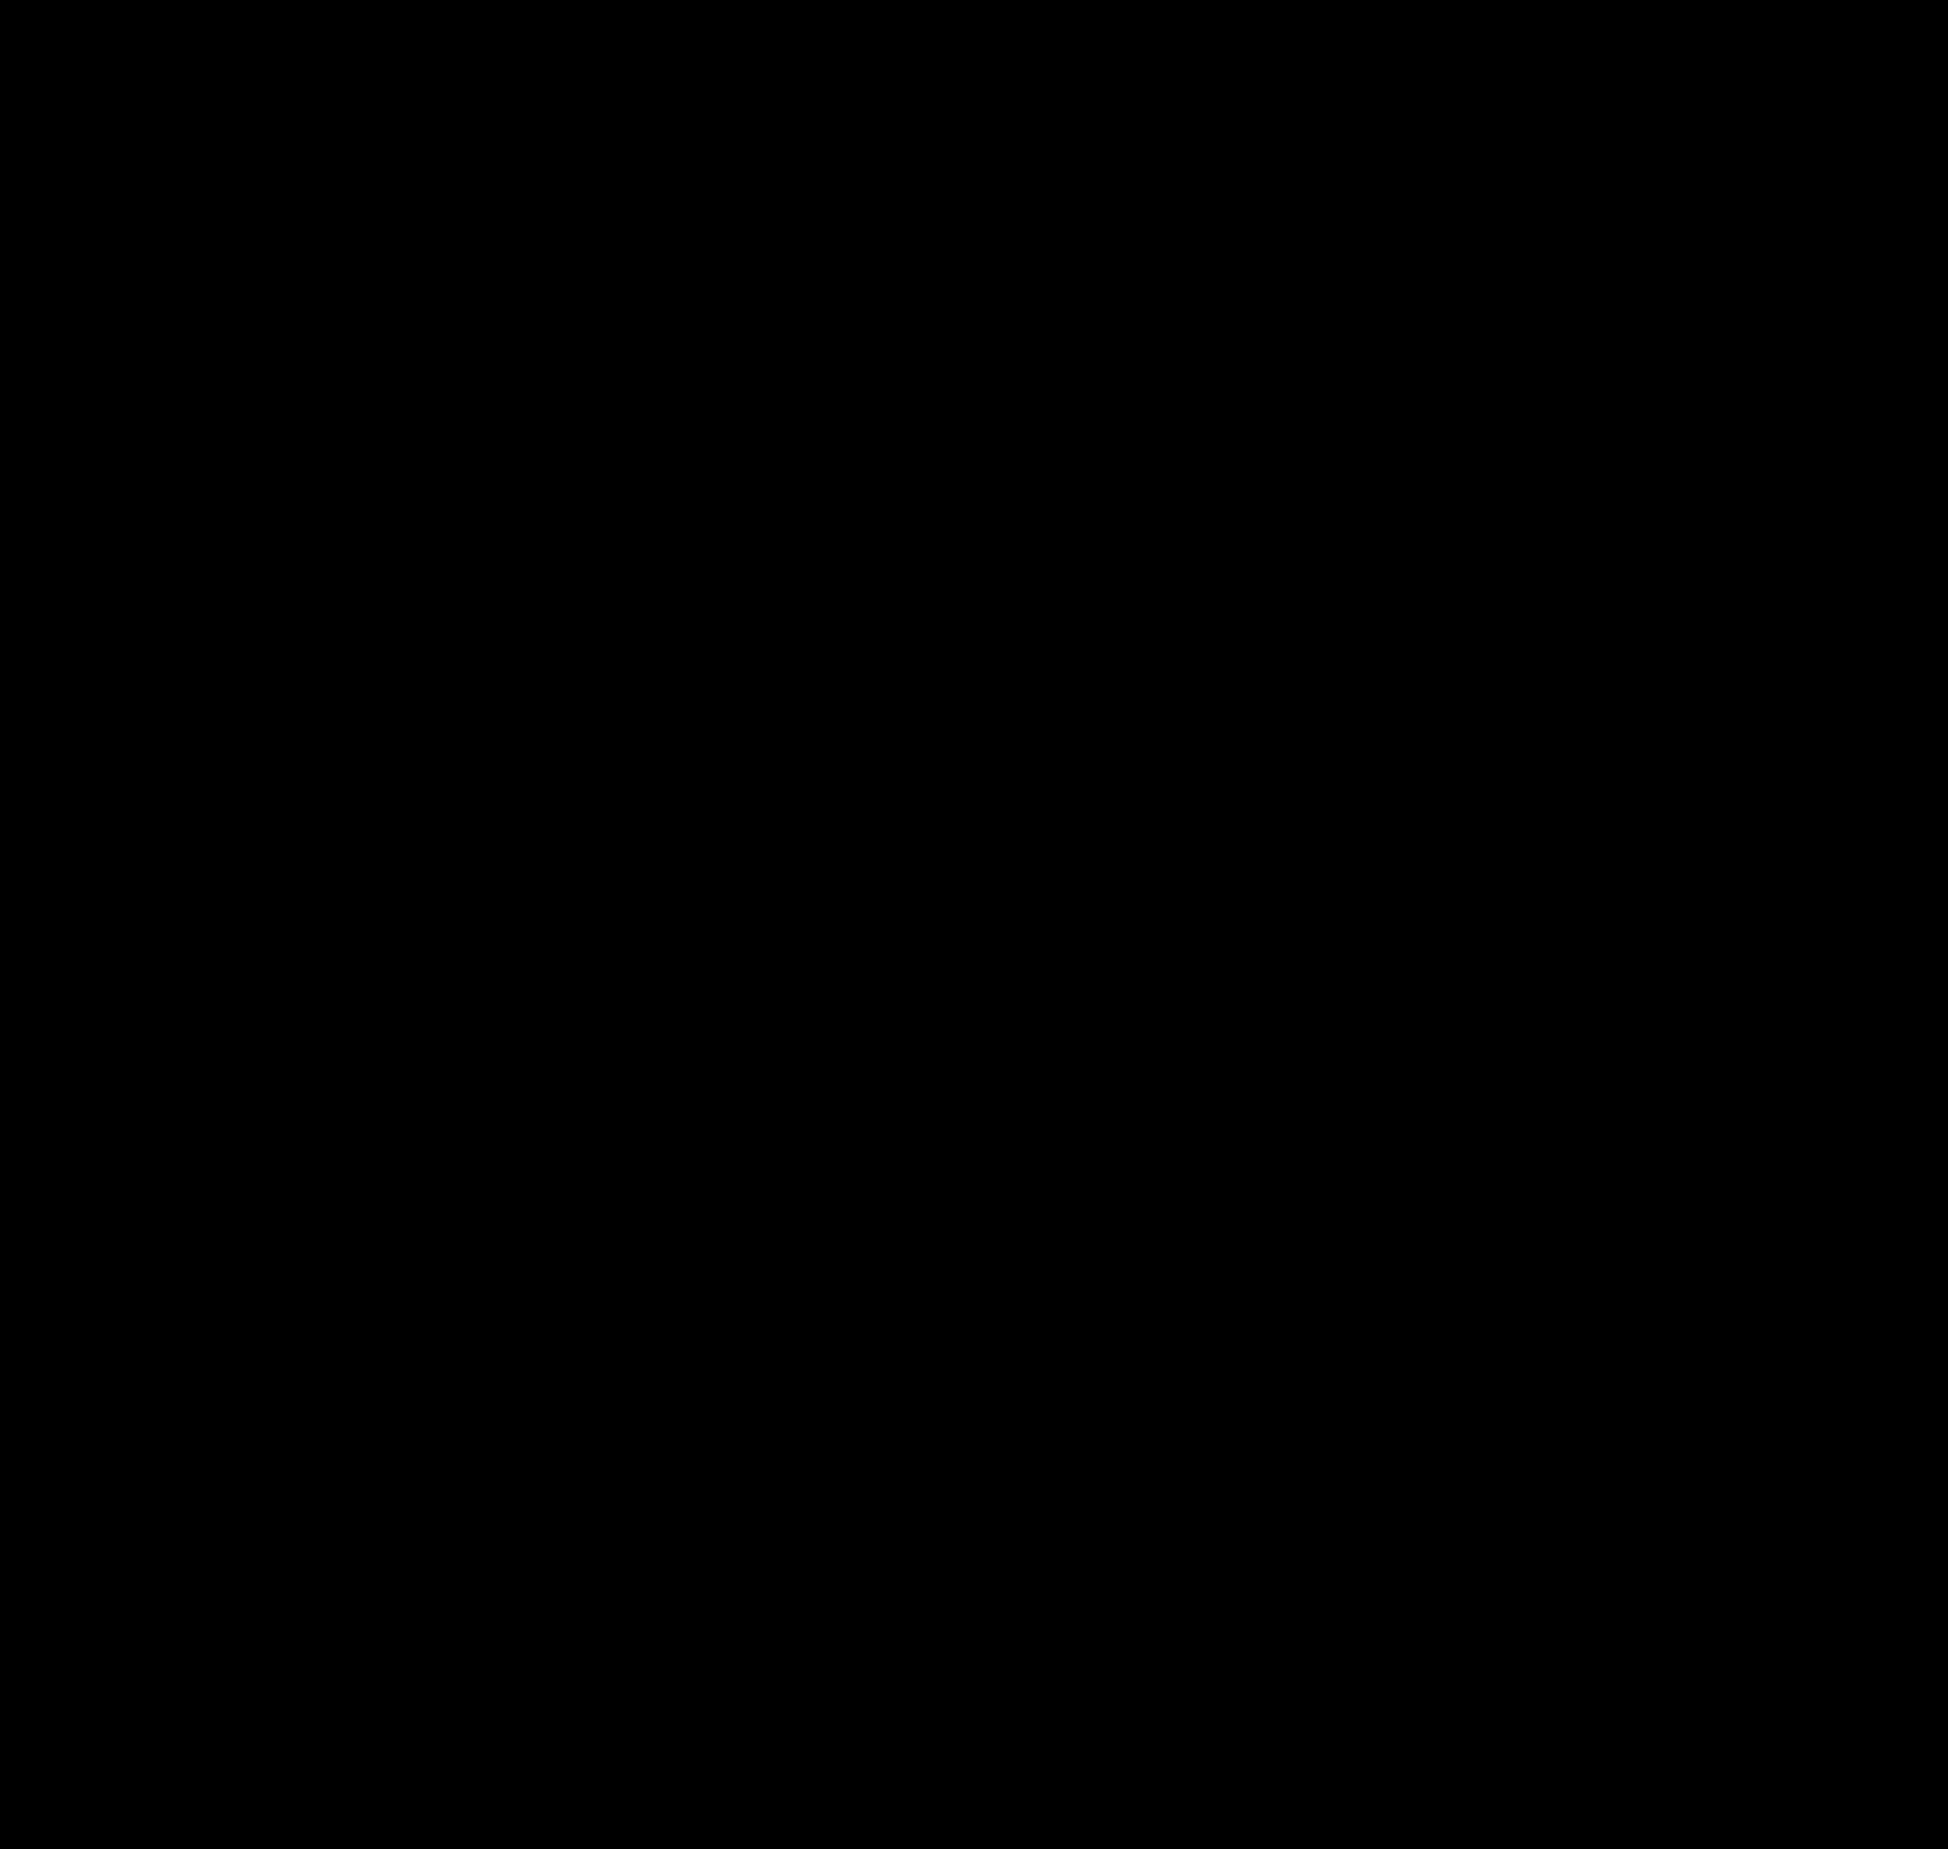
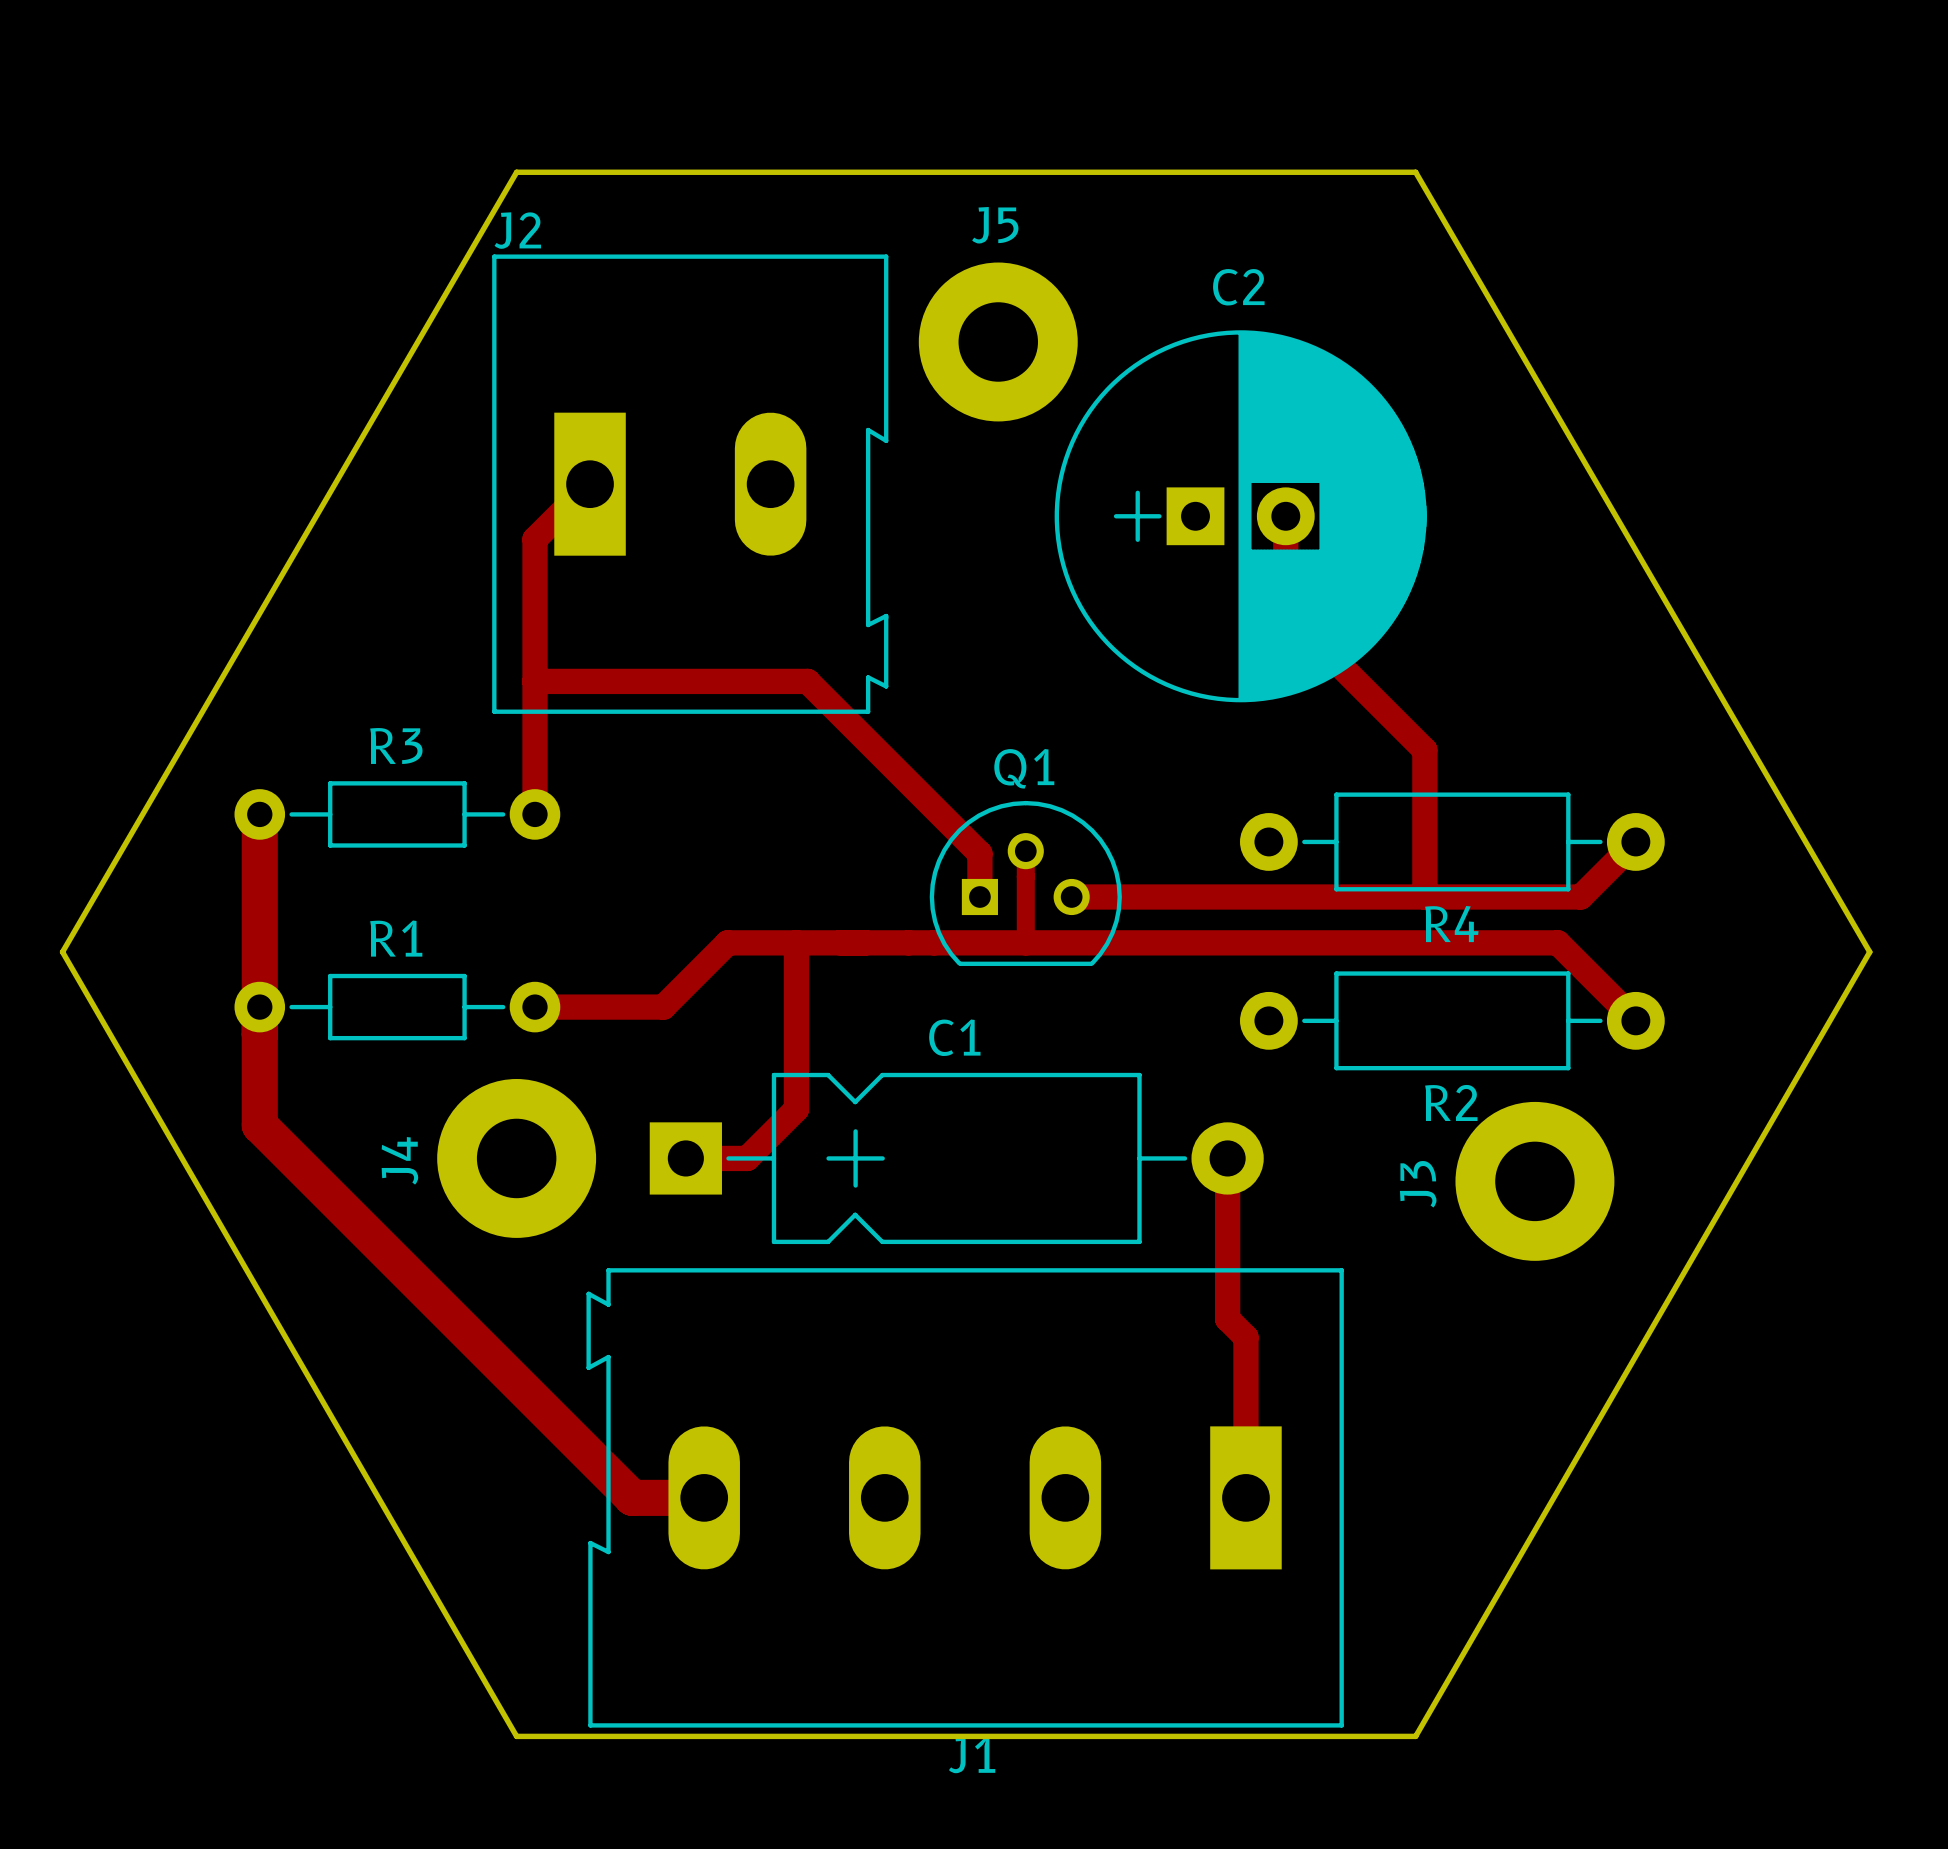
board edge: none -> (516, 172) (62, 952) (516, 1736) (1415, 1736) (1869, 952) (1415, 172) (516, 172)
J5: none -> (998, 341)
top track: none -> (590, 484) (534, 539) (534, 814)
J2: none -> (690, 484)
C2: none -> (1240, 516)
top track: none -> (1285, 516) (1285, 611) (1424, 750) (1424, 897)
top track: none -> (534, 681) (807, 681) (979, 853) (979, 897)
top track: none -> (259, 814) (259, 1125) (632, 1497) (704, 1497)
R3: none -> (397, 814)
R4: none -> (1452, 841)
top track: none -> (1635, 841) (1580, 897) (1071, 897)
top track: none -> (1025, 851) (1025, 942)
Q1: none -> (1025, 883)
top track: none -> (796, 942) (796, 1109) (747, 1158) (685, 1158)
R1: none -> (397, 1007)
top track: none -> (534, 1007) (663, 1007) (727, 942) (1557, 942) (1635, 1020)
R2: none -> (1452, 1020)
J4: none -> (516, 1158)
C1: none -> (956, 1158)
top track: none -> (1227, 1158) (1227, 1318) (1245, 1337) (1245, 1497)
J3: none -> (1534, 1181)
J1: none -> (965, 1497)

